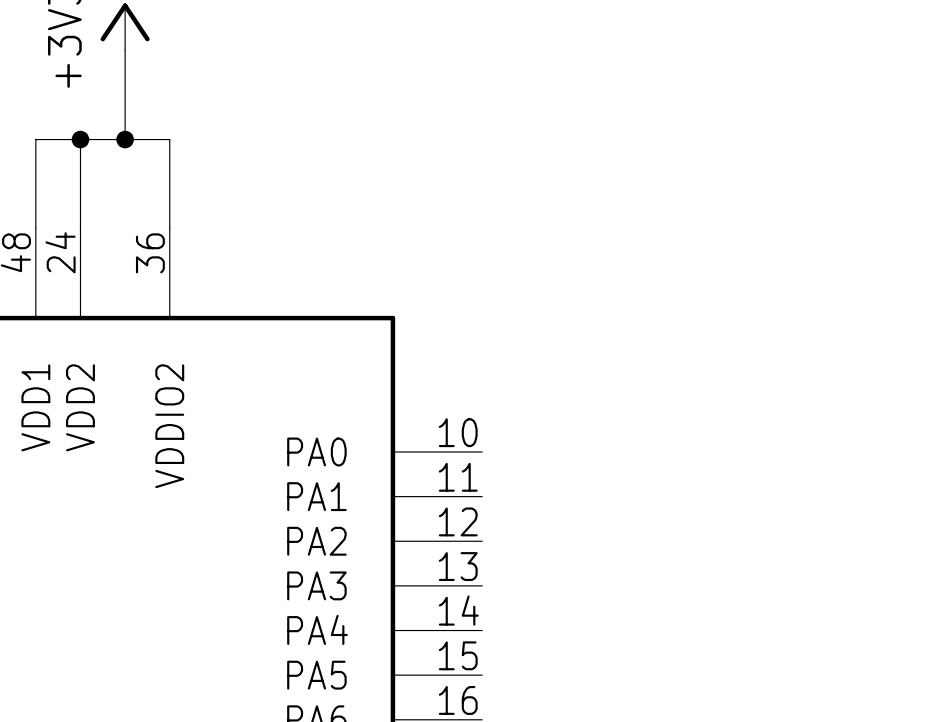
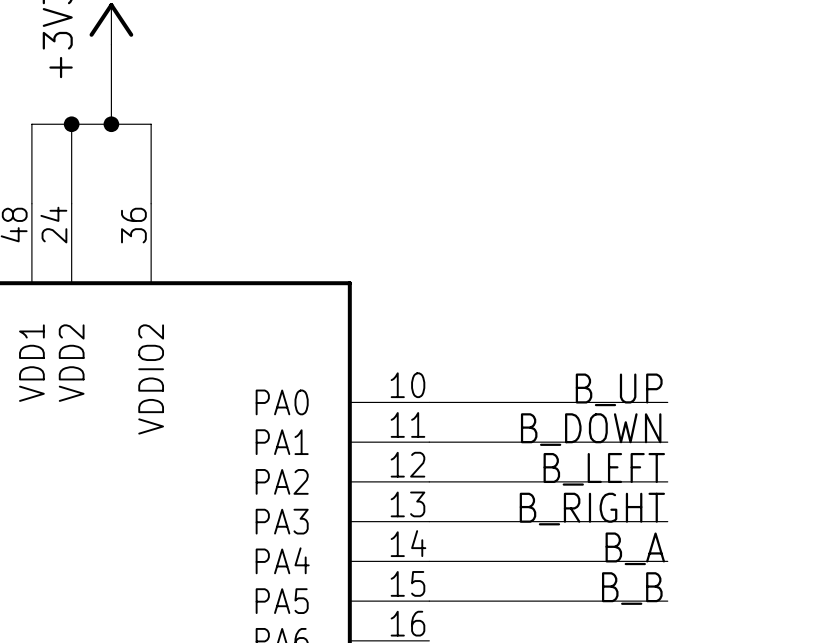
label: none -> B_UP (619, 389)
wire: none -> (429, 402) (667, 402)
label: none -> B_DOWN (591, 429)
wire: none -> (429, 442) (667, 442)
label: none -> B_LEFT (604, 469)
wire: none -> (429, 481) (667, 481)
label: none -> B_RIGHT (592, 509)
wire: none -> (429, 521) (667, 521)
label: none -> B_A (635, 548)
wire: none -> (429, 561) (667, 561)
label: none -> B_B (632, 588)
wire: none -> (429, 601) (667, 601)

